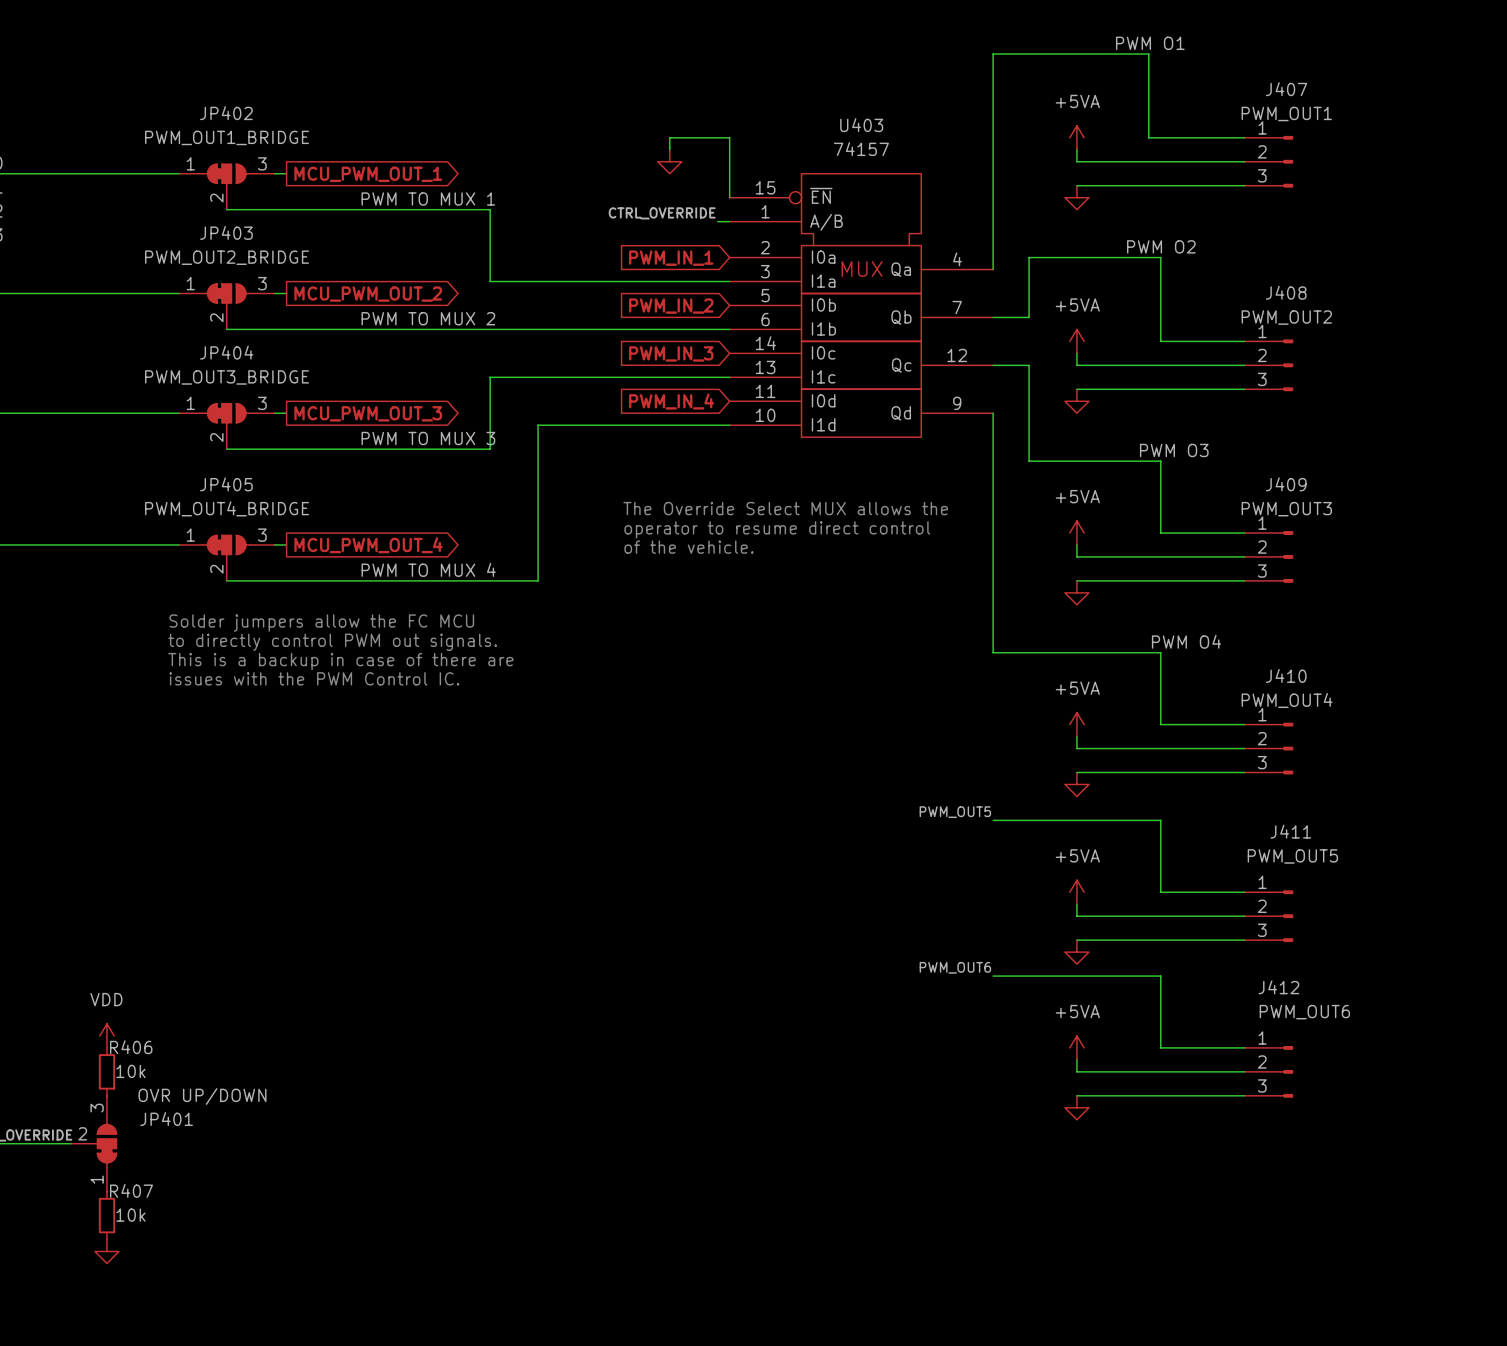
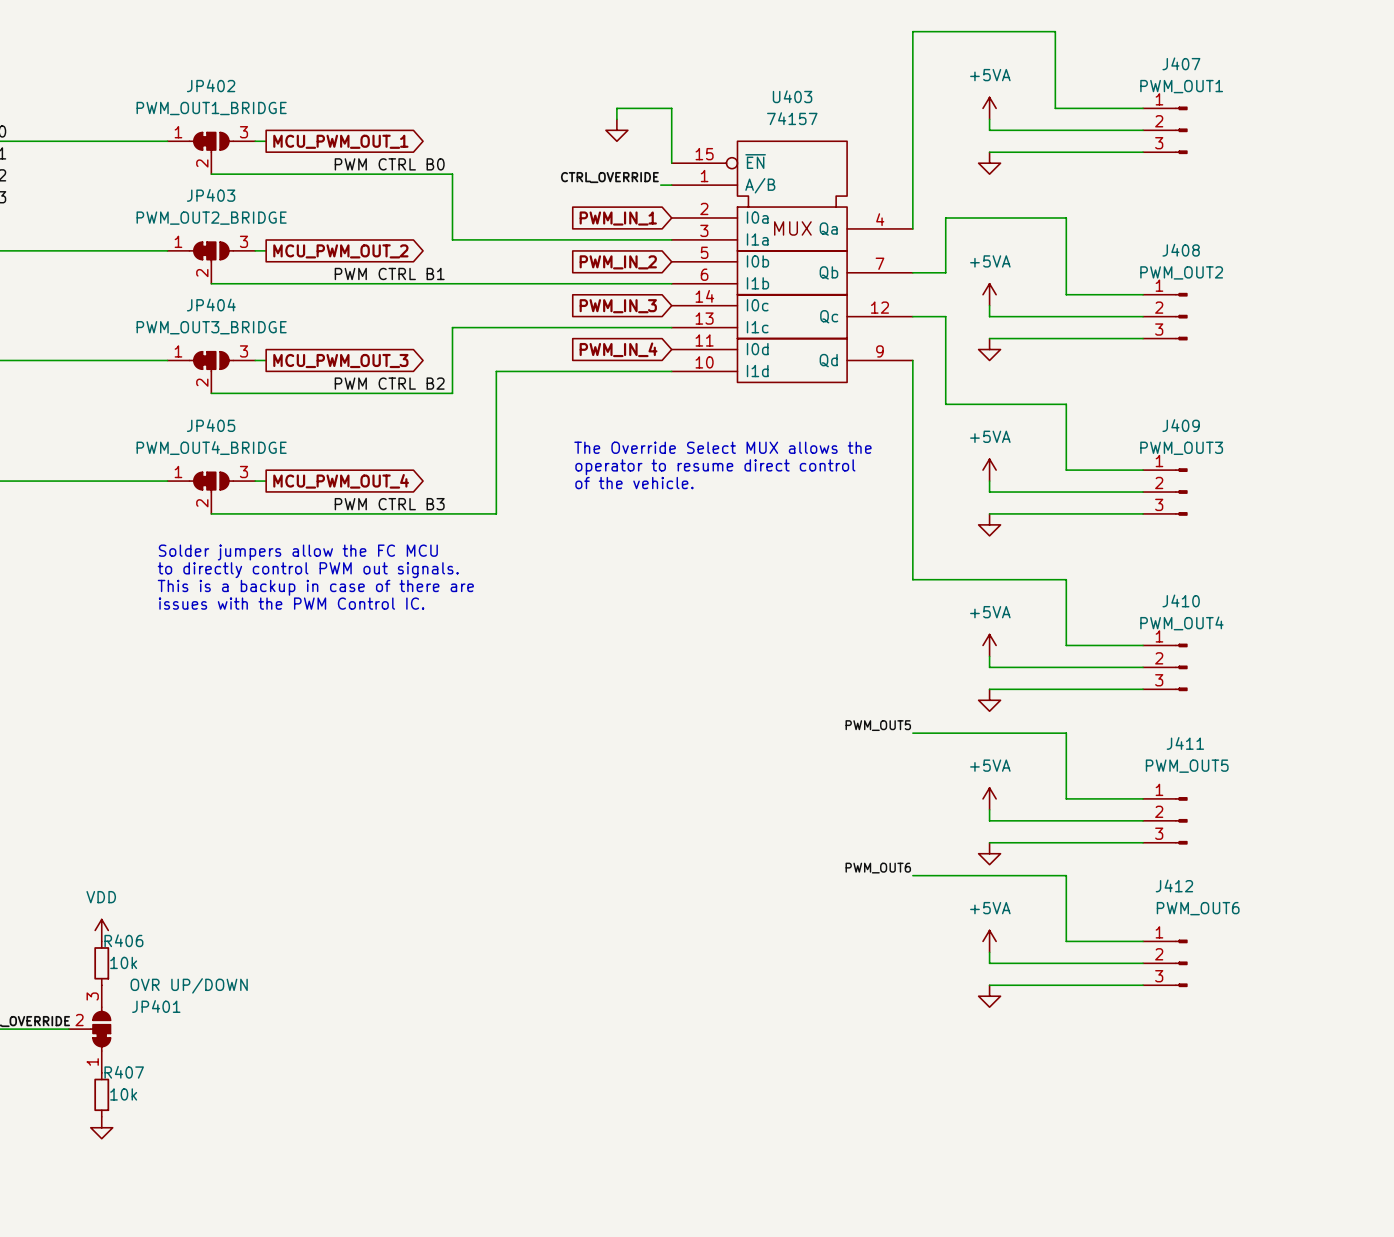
label: PWM O1 (1150, 43) -> none
label: PWM TO MUX 1 (428, 198) -> PWM CTRL B0 (389, 164)
label: PWM O2 (1161, 246) -> none
label: PWM TO MUX 2 (428, 318) -> PWM CTRL B1 (389, 273)
label: PWM TO MUX 3 (428, 438) -> PWM CTRL B2 (389, 383)
label: PWM O3 (1174, 450) -> none
label: PWM TO MUX 4 (428, 569) -> PWM CTRL B3 (389, 504)
label: PWM O4 (1186, 641) -> none

